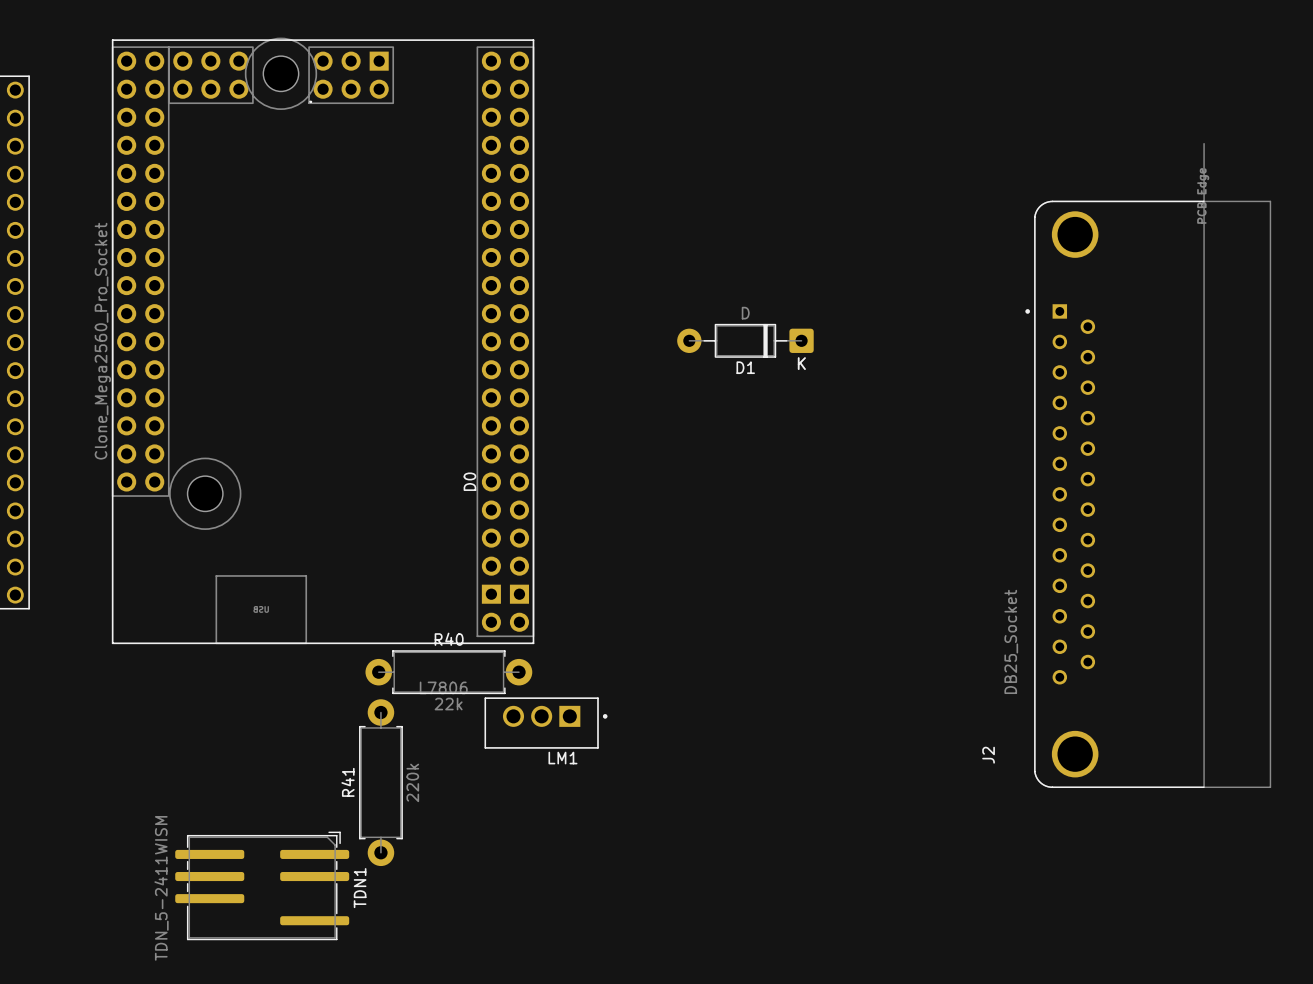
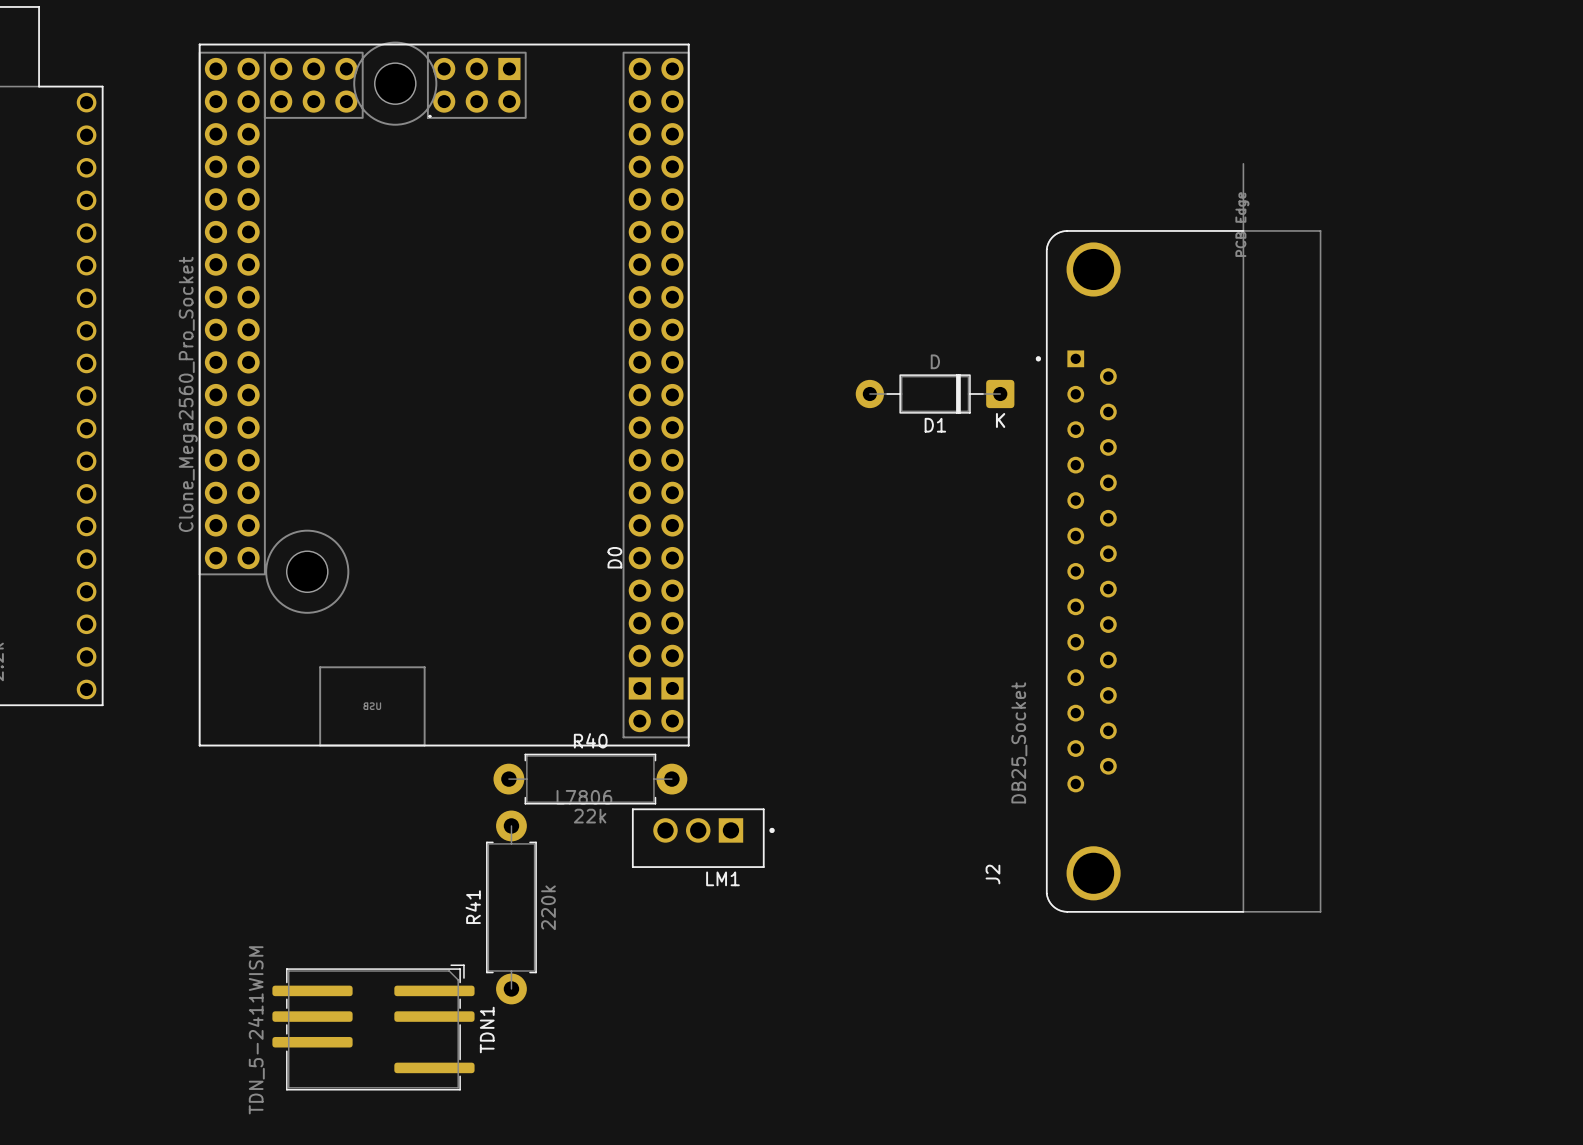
J2 position: (1148, 465) -> (1178, 537)

